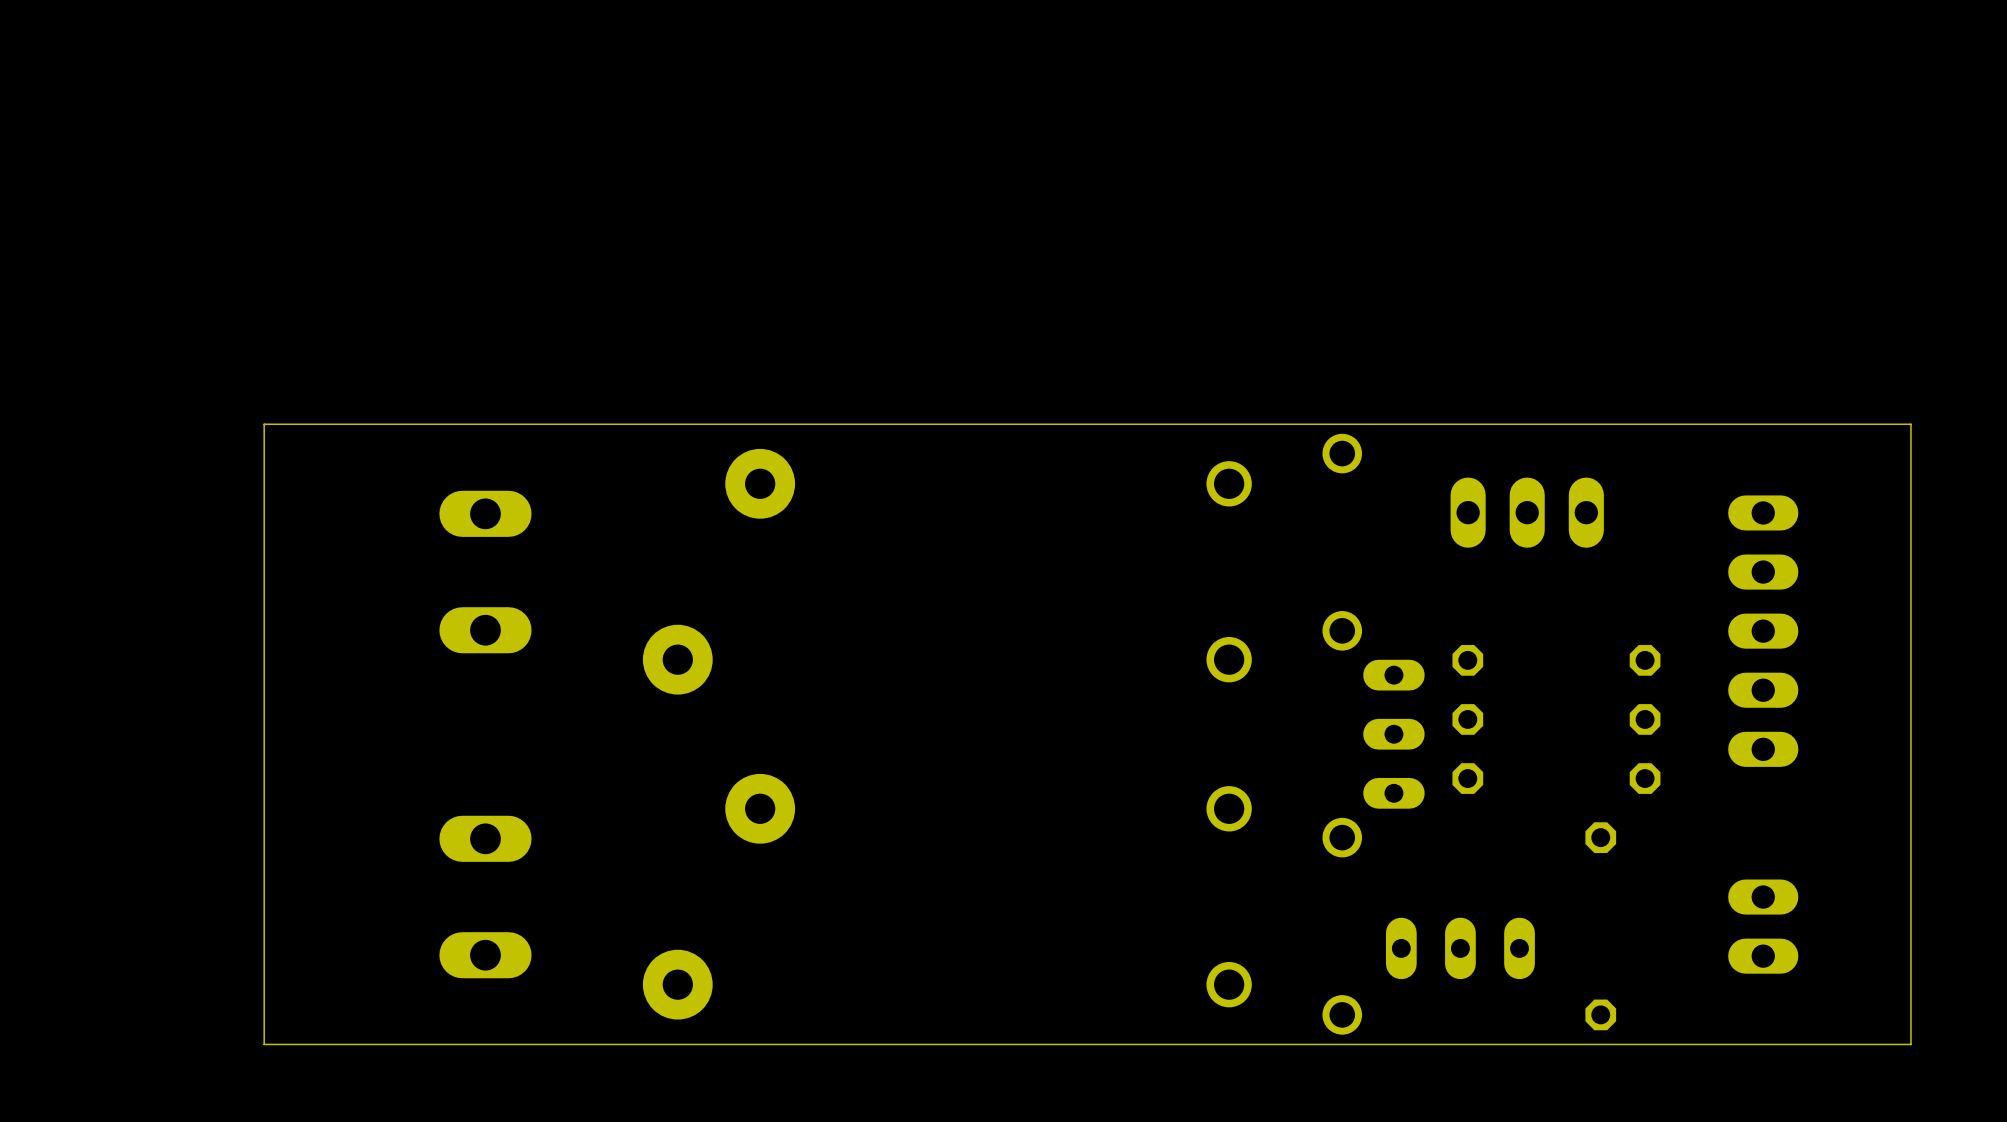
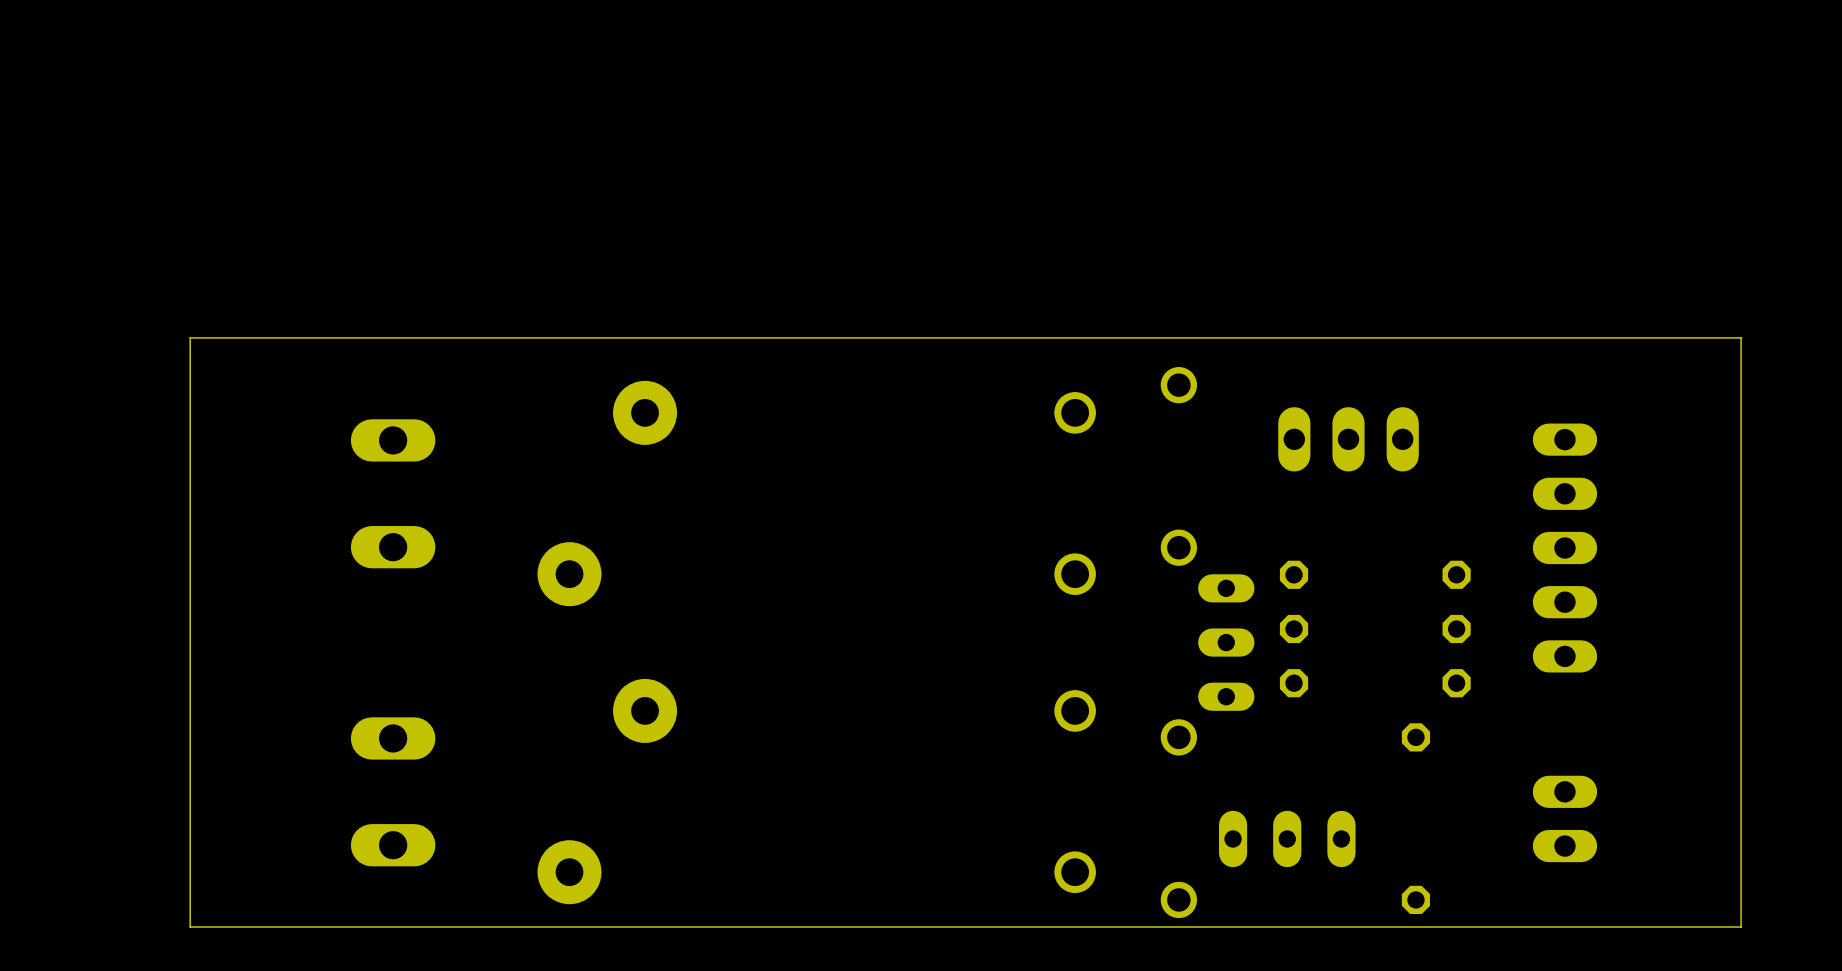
board edge: (264, 424) (1910, 424) (1910, 1044) -> (190, 358) (190, 337) (1741, 337) (1741, 927) (1700, 927)

